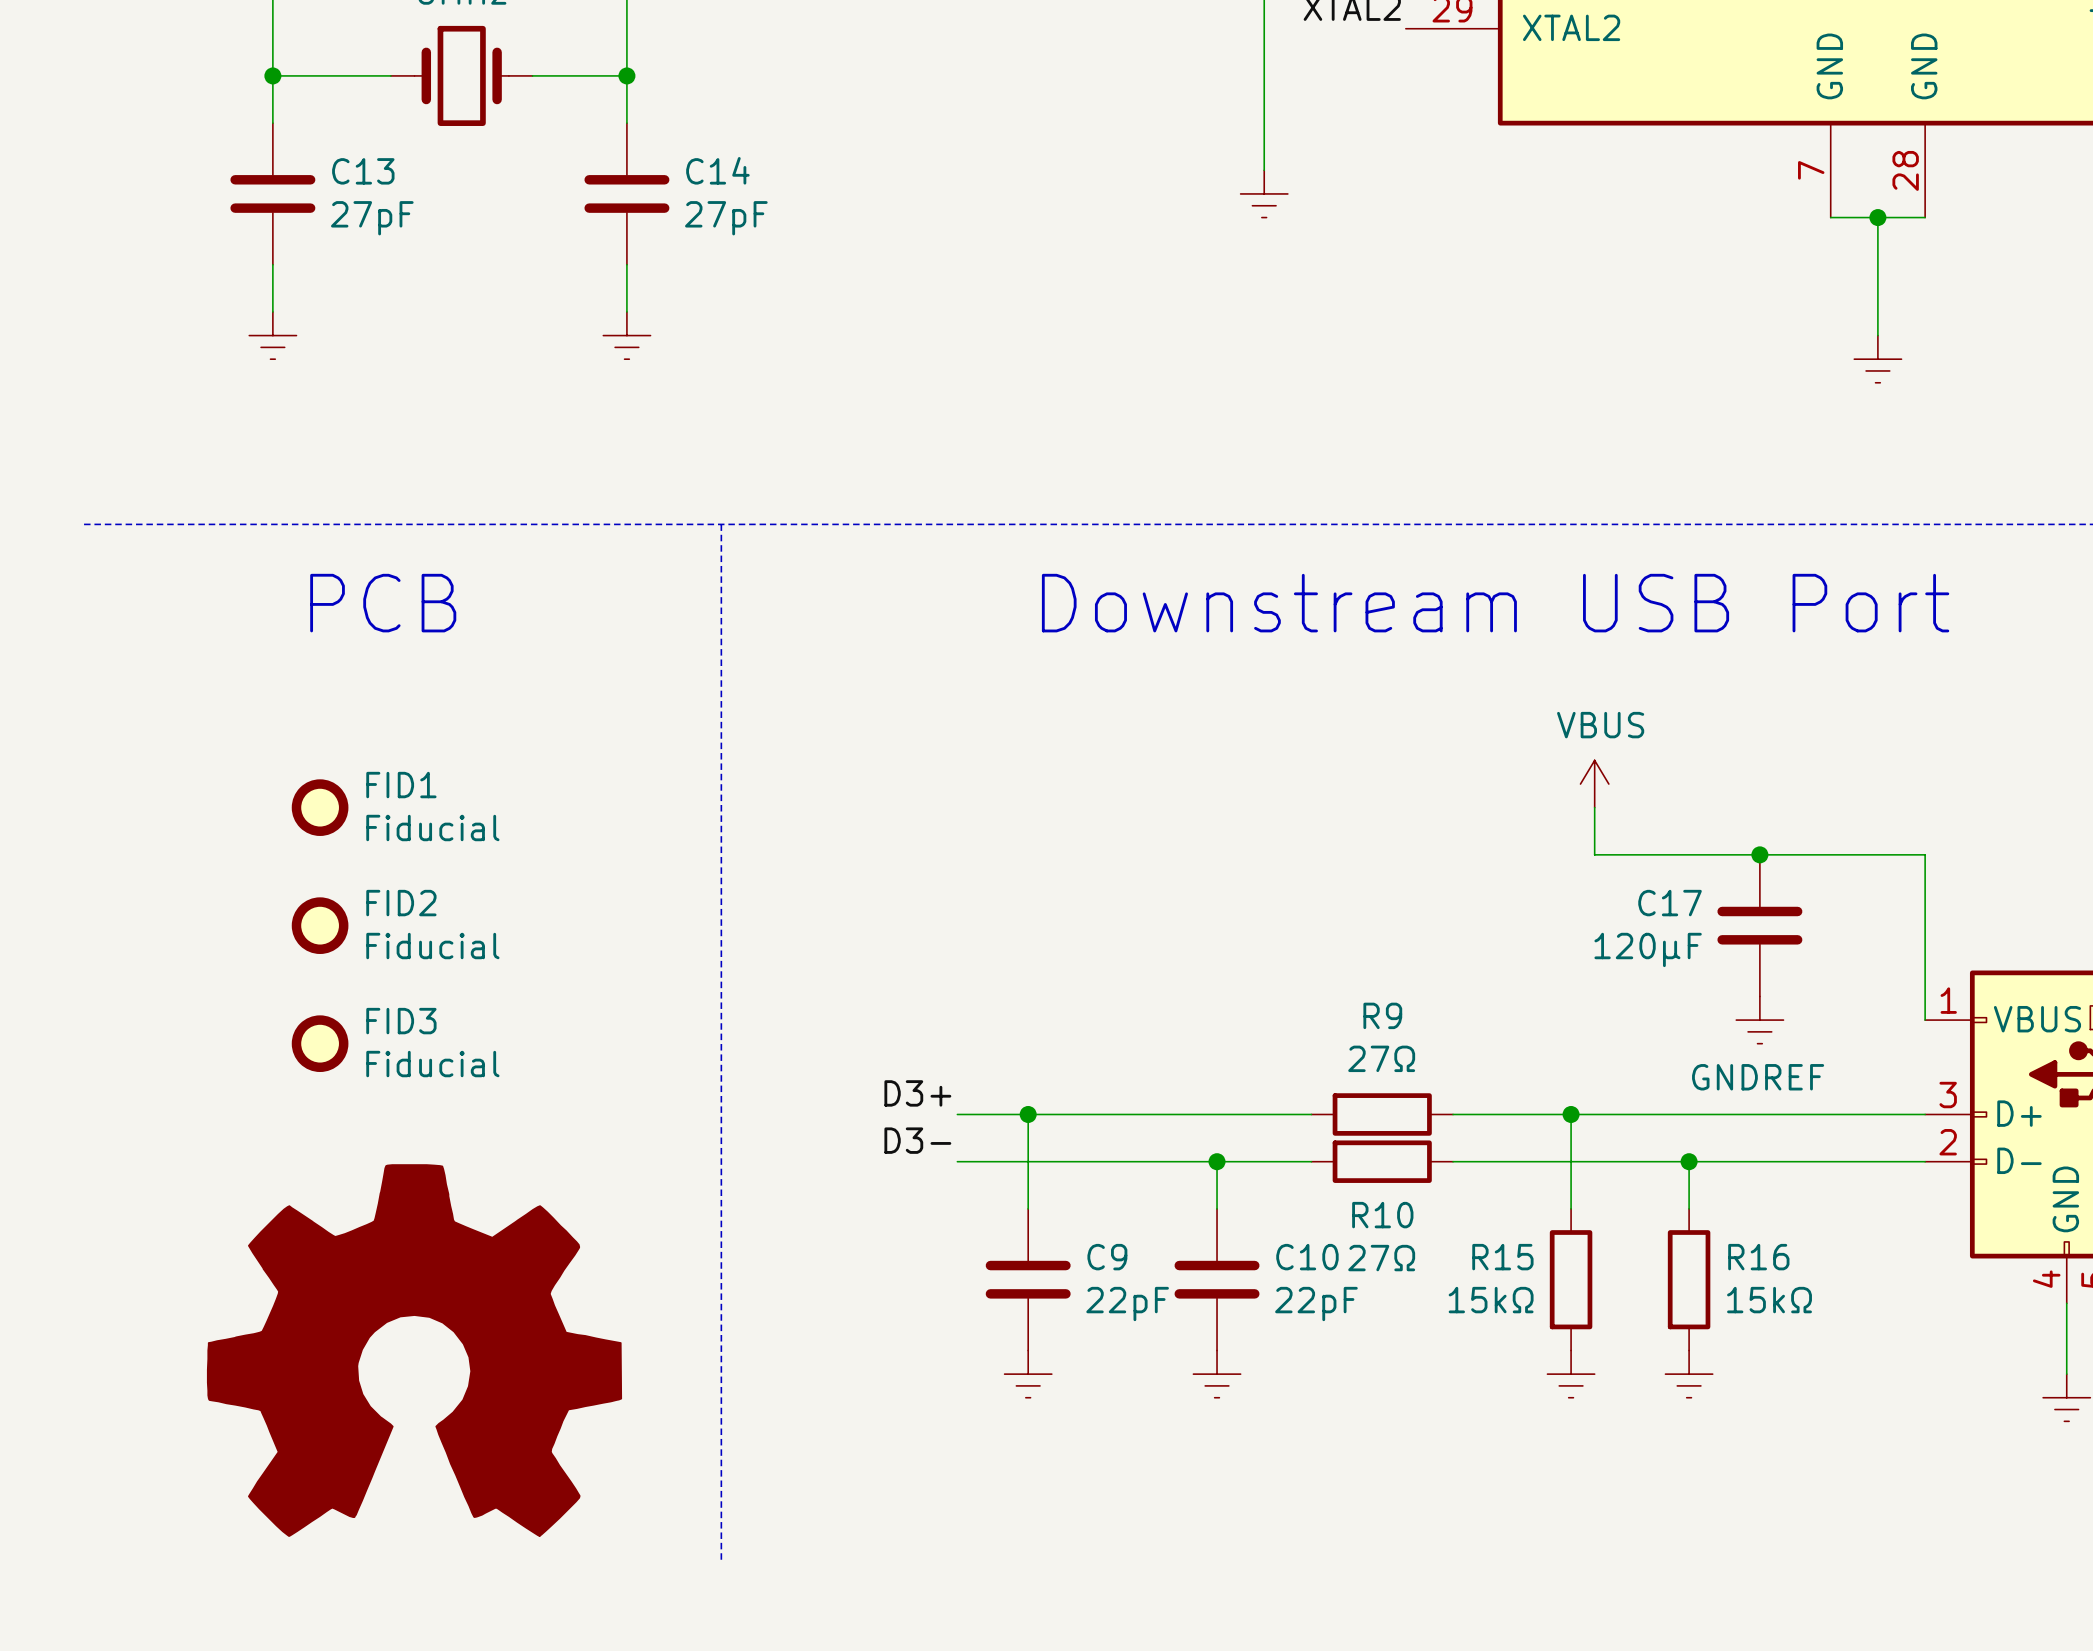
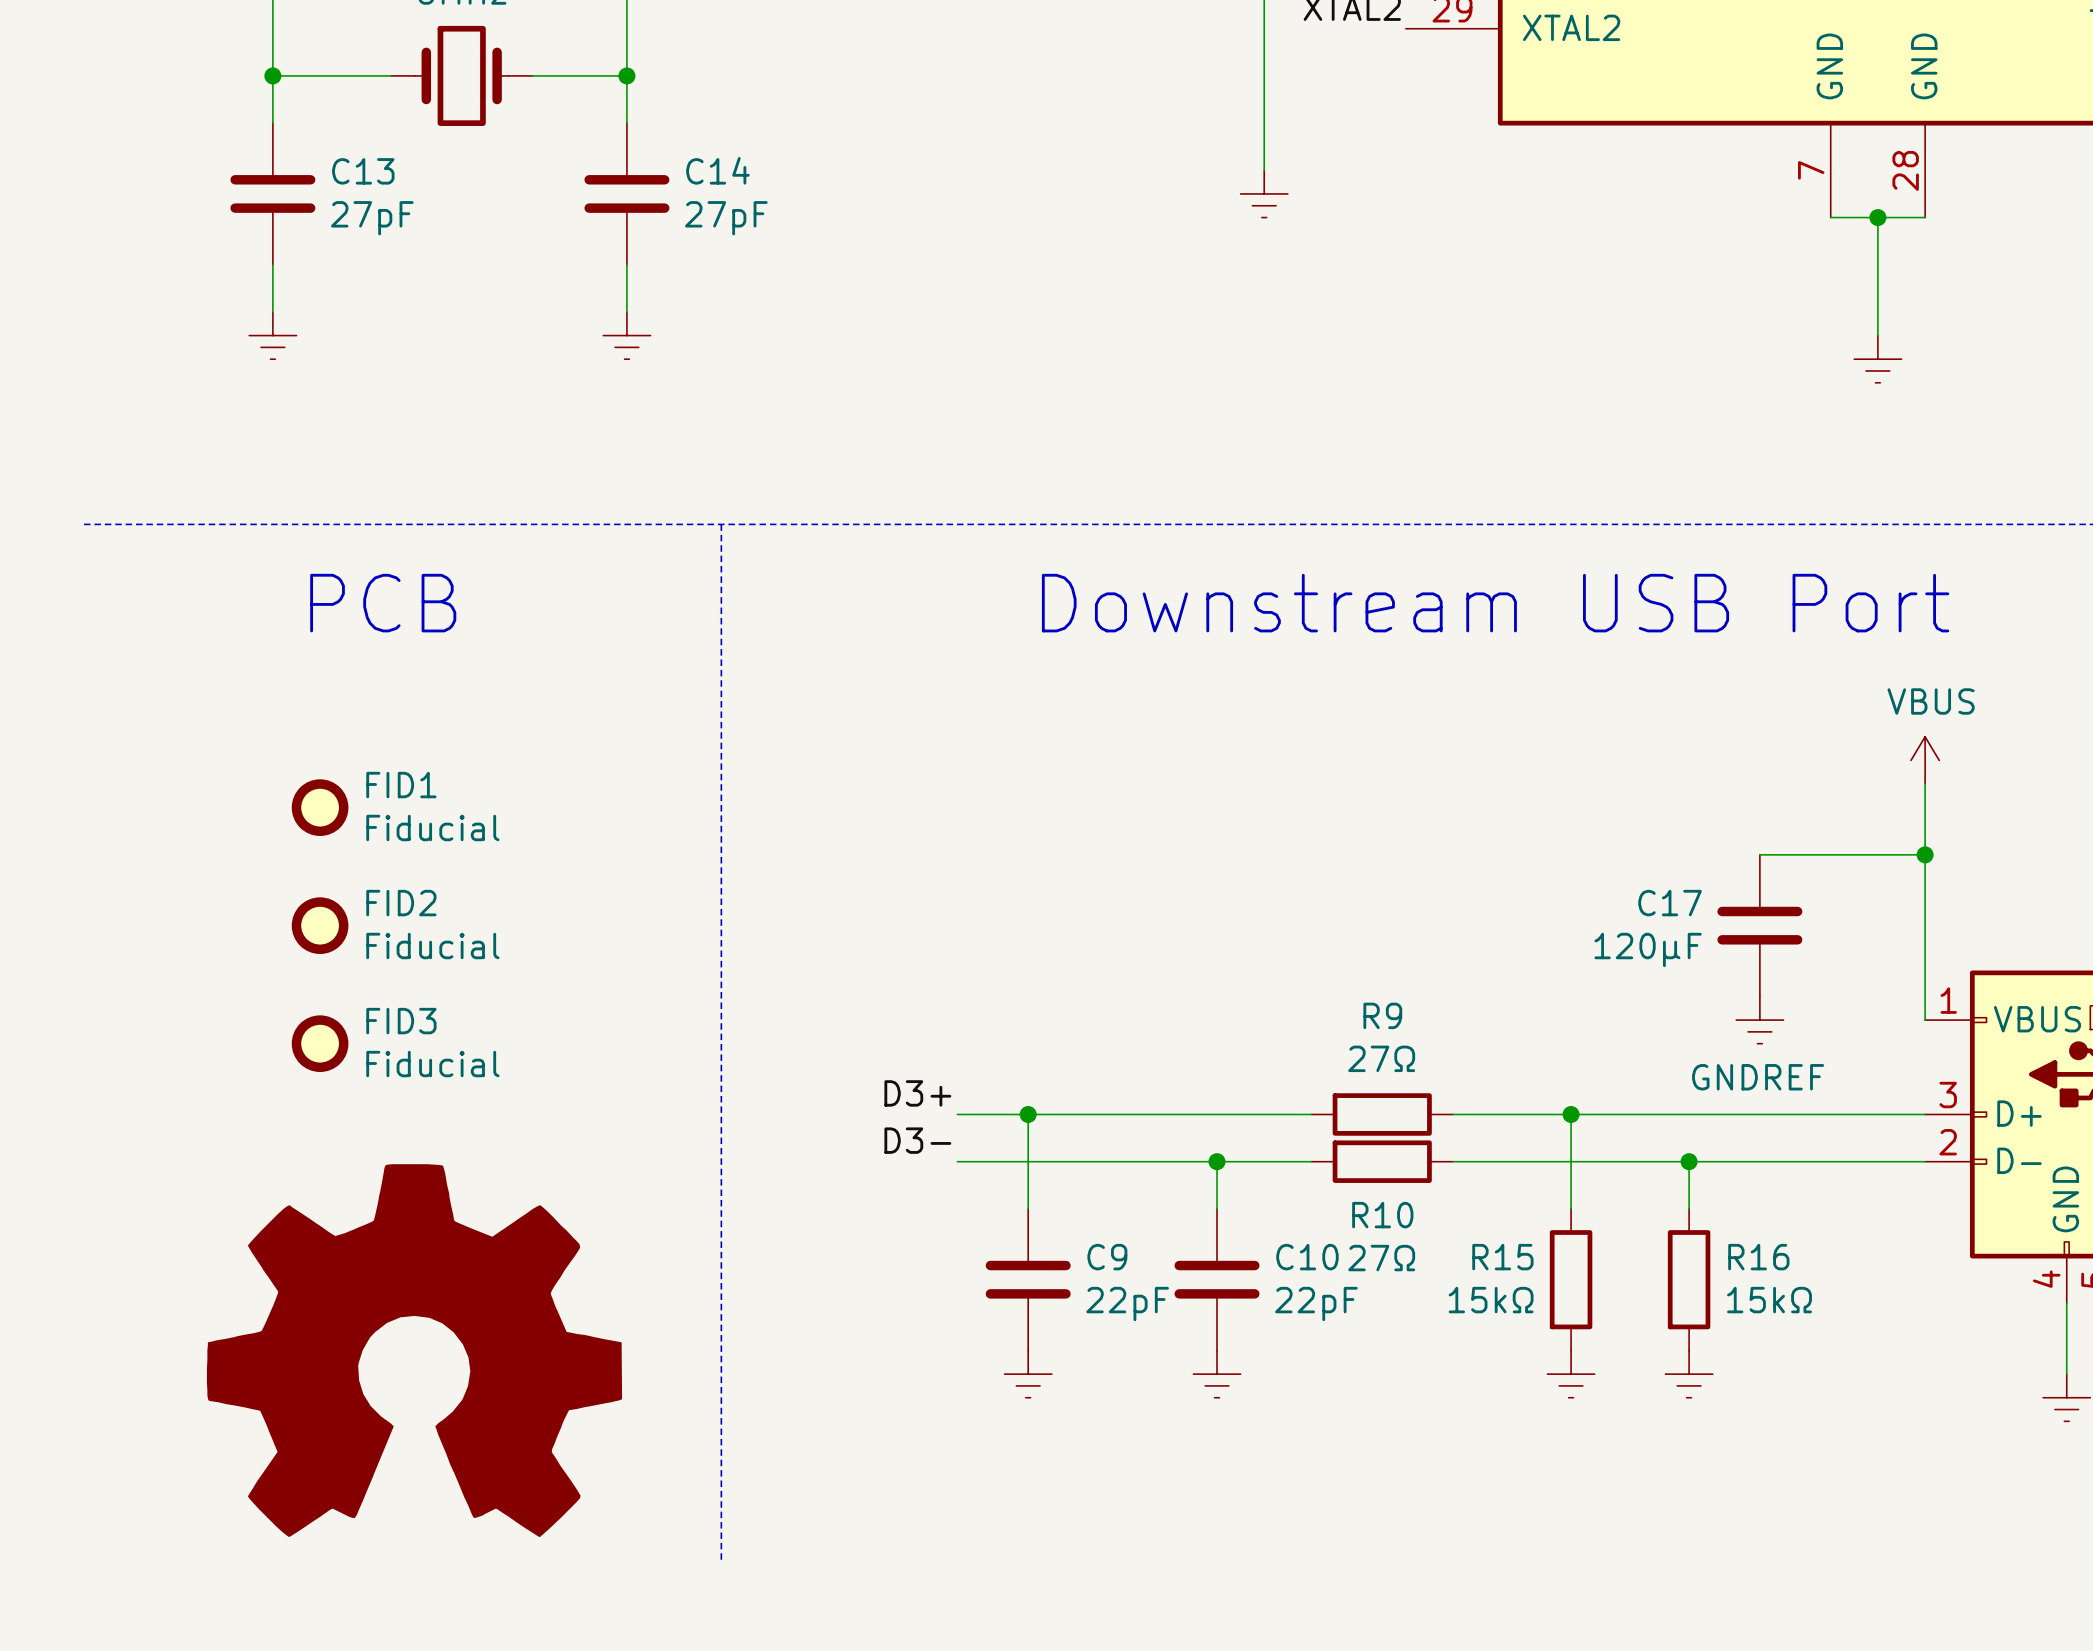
power symbol position: VBUS (1594, 784) -> VBUS (1925, 760)
wire: none -> (1925, 784) (1925, 854)
wire: (1594, 807) (1594, 854) (1759, 854) -> none
junction: (1759, 854) -> none
junction: none -> (1925, 854)

